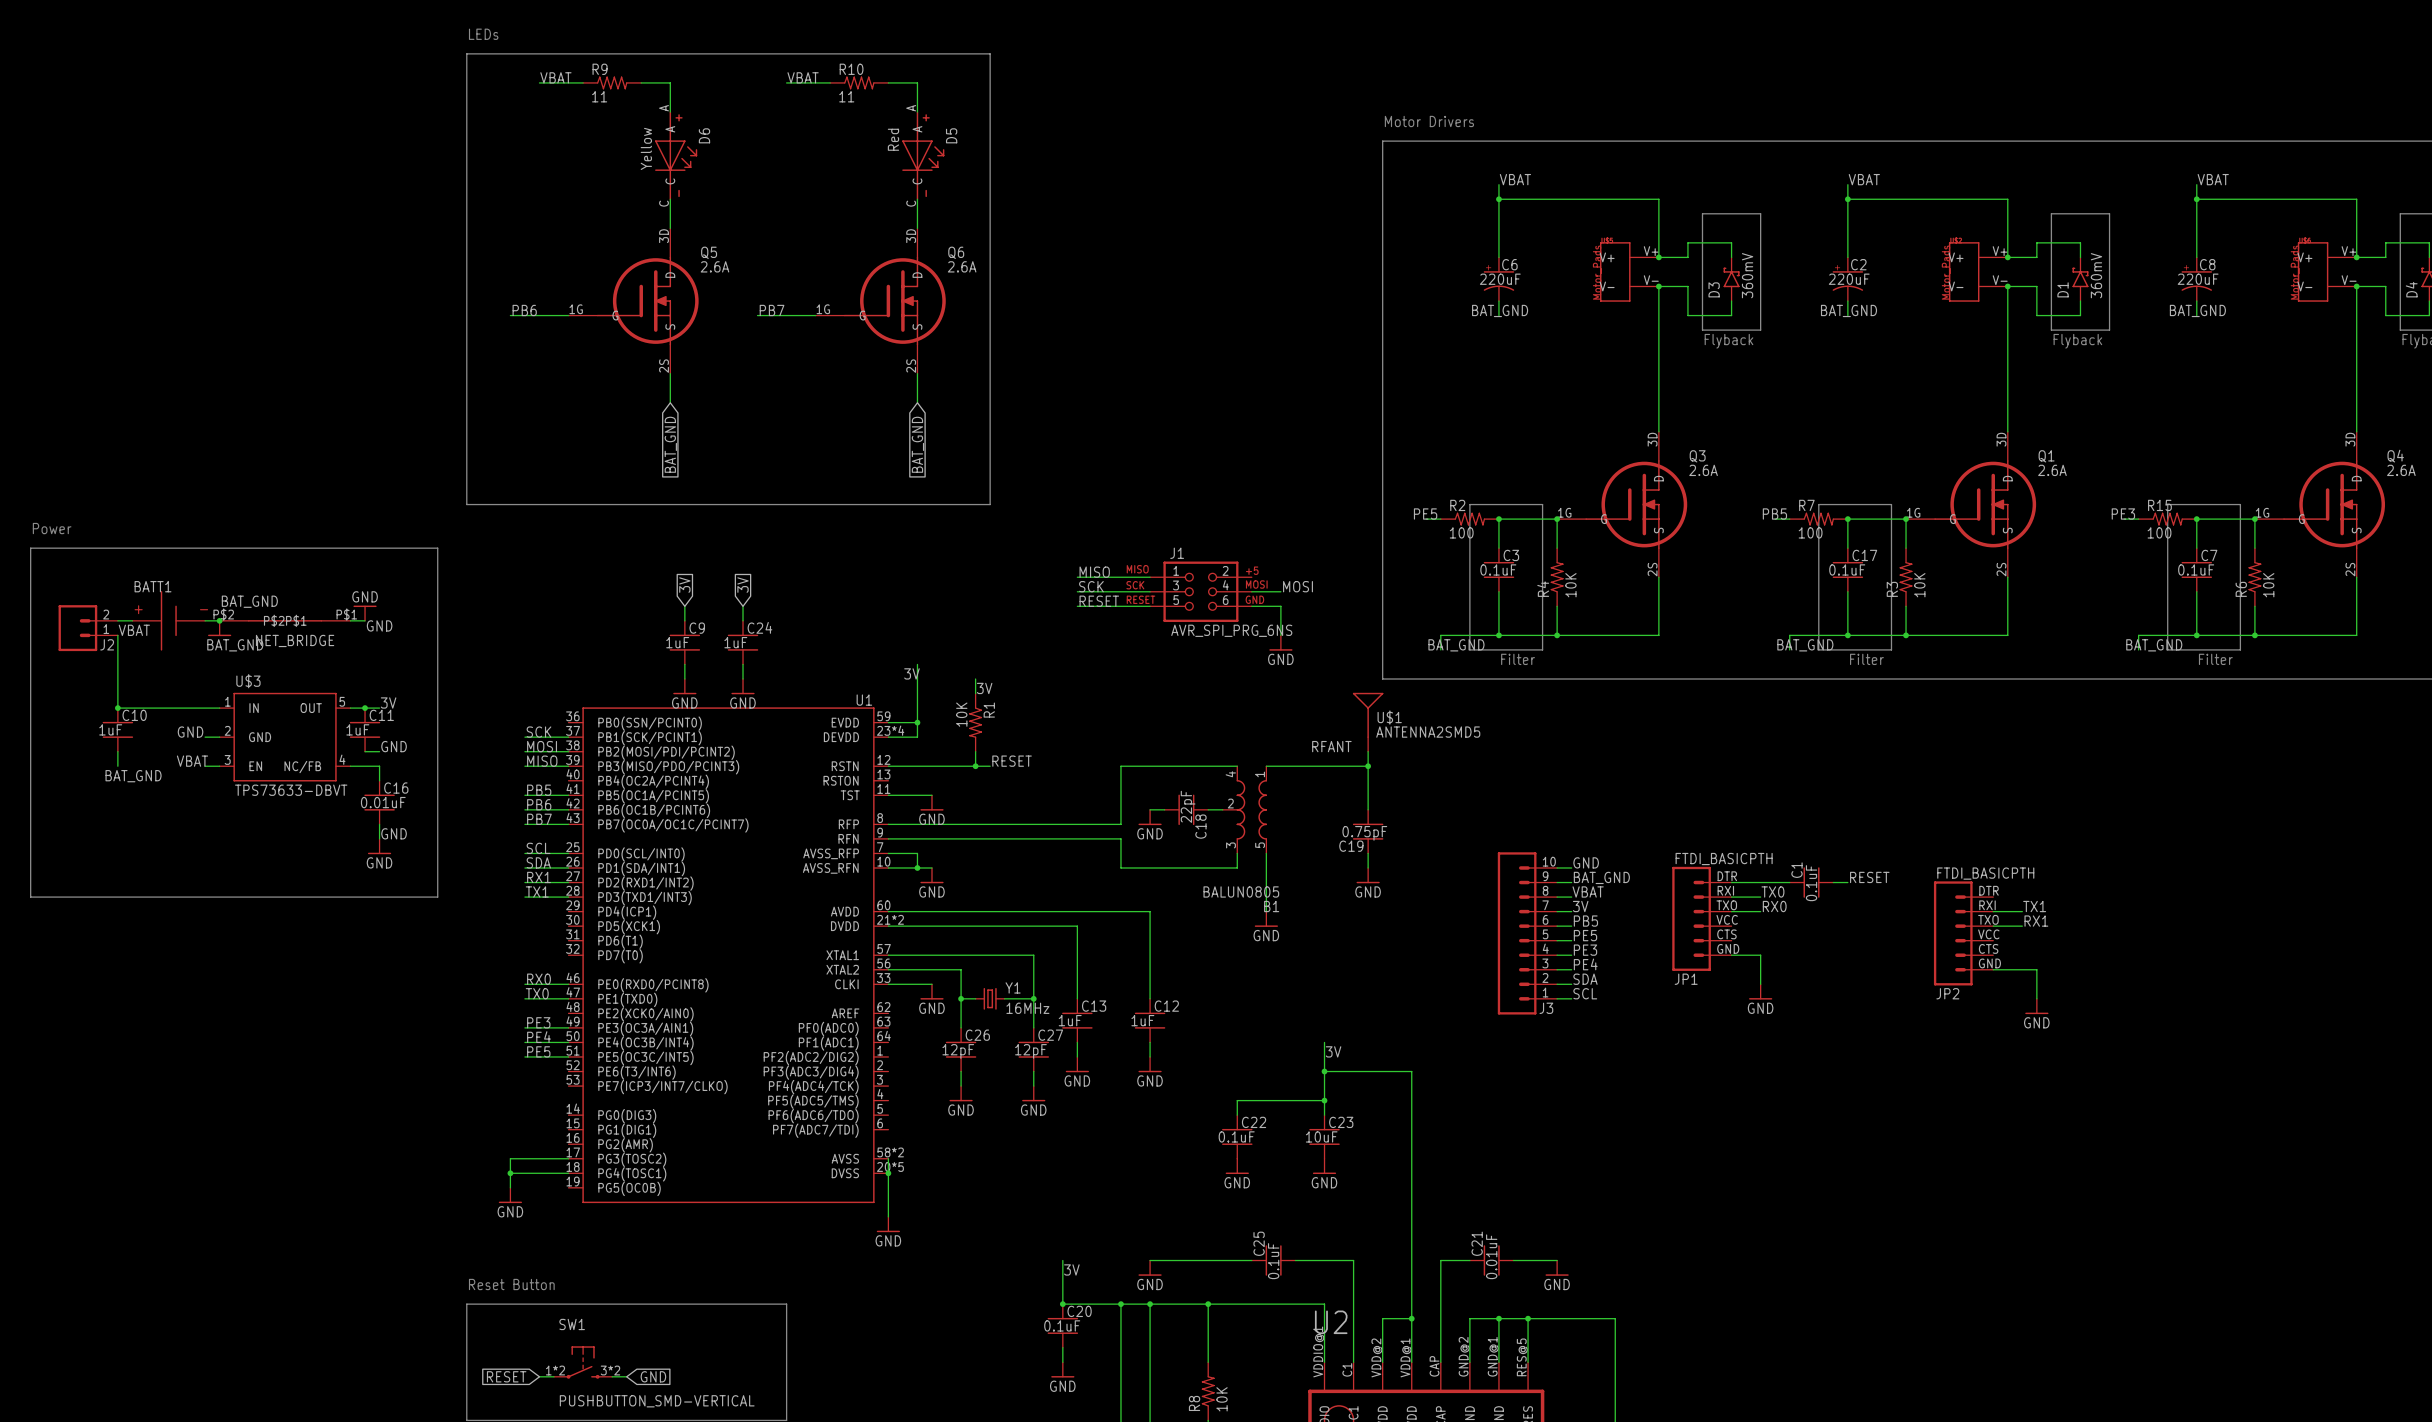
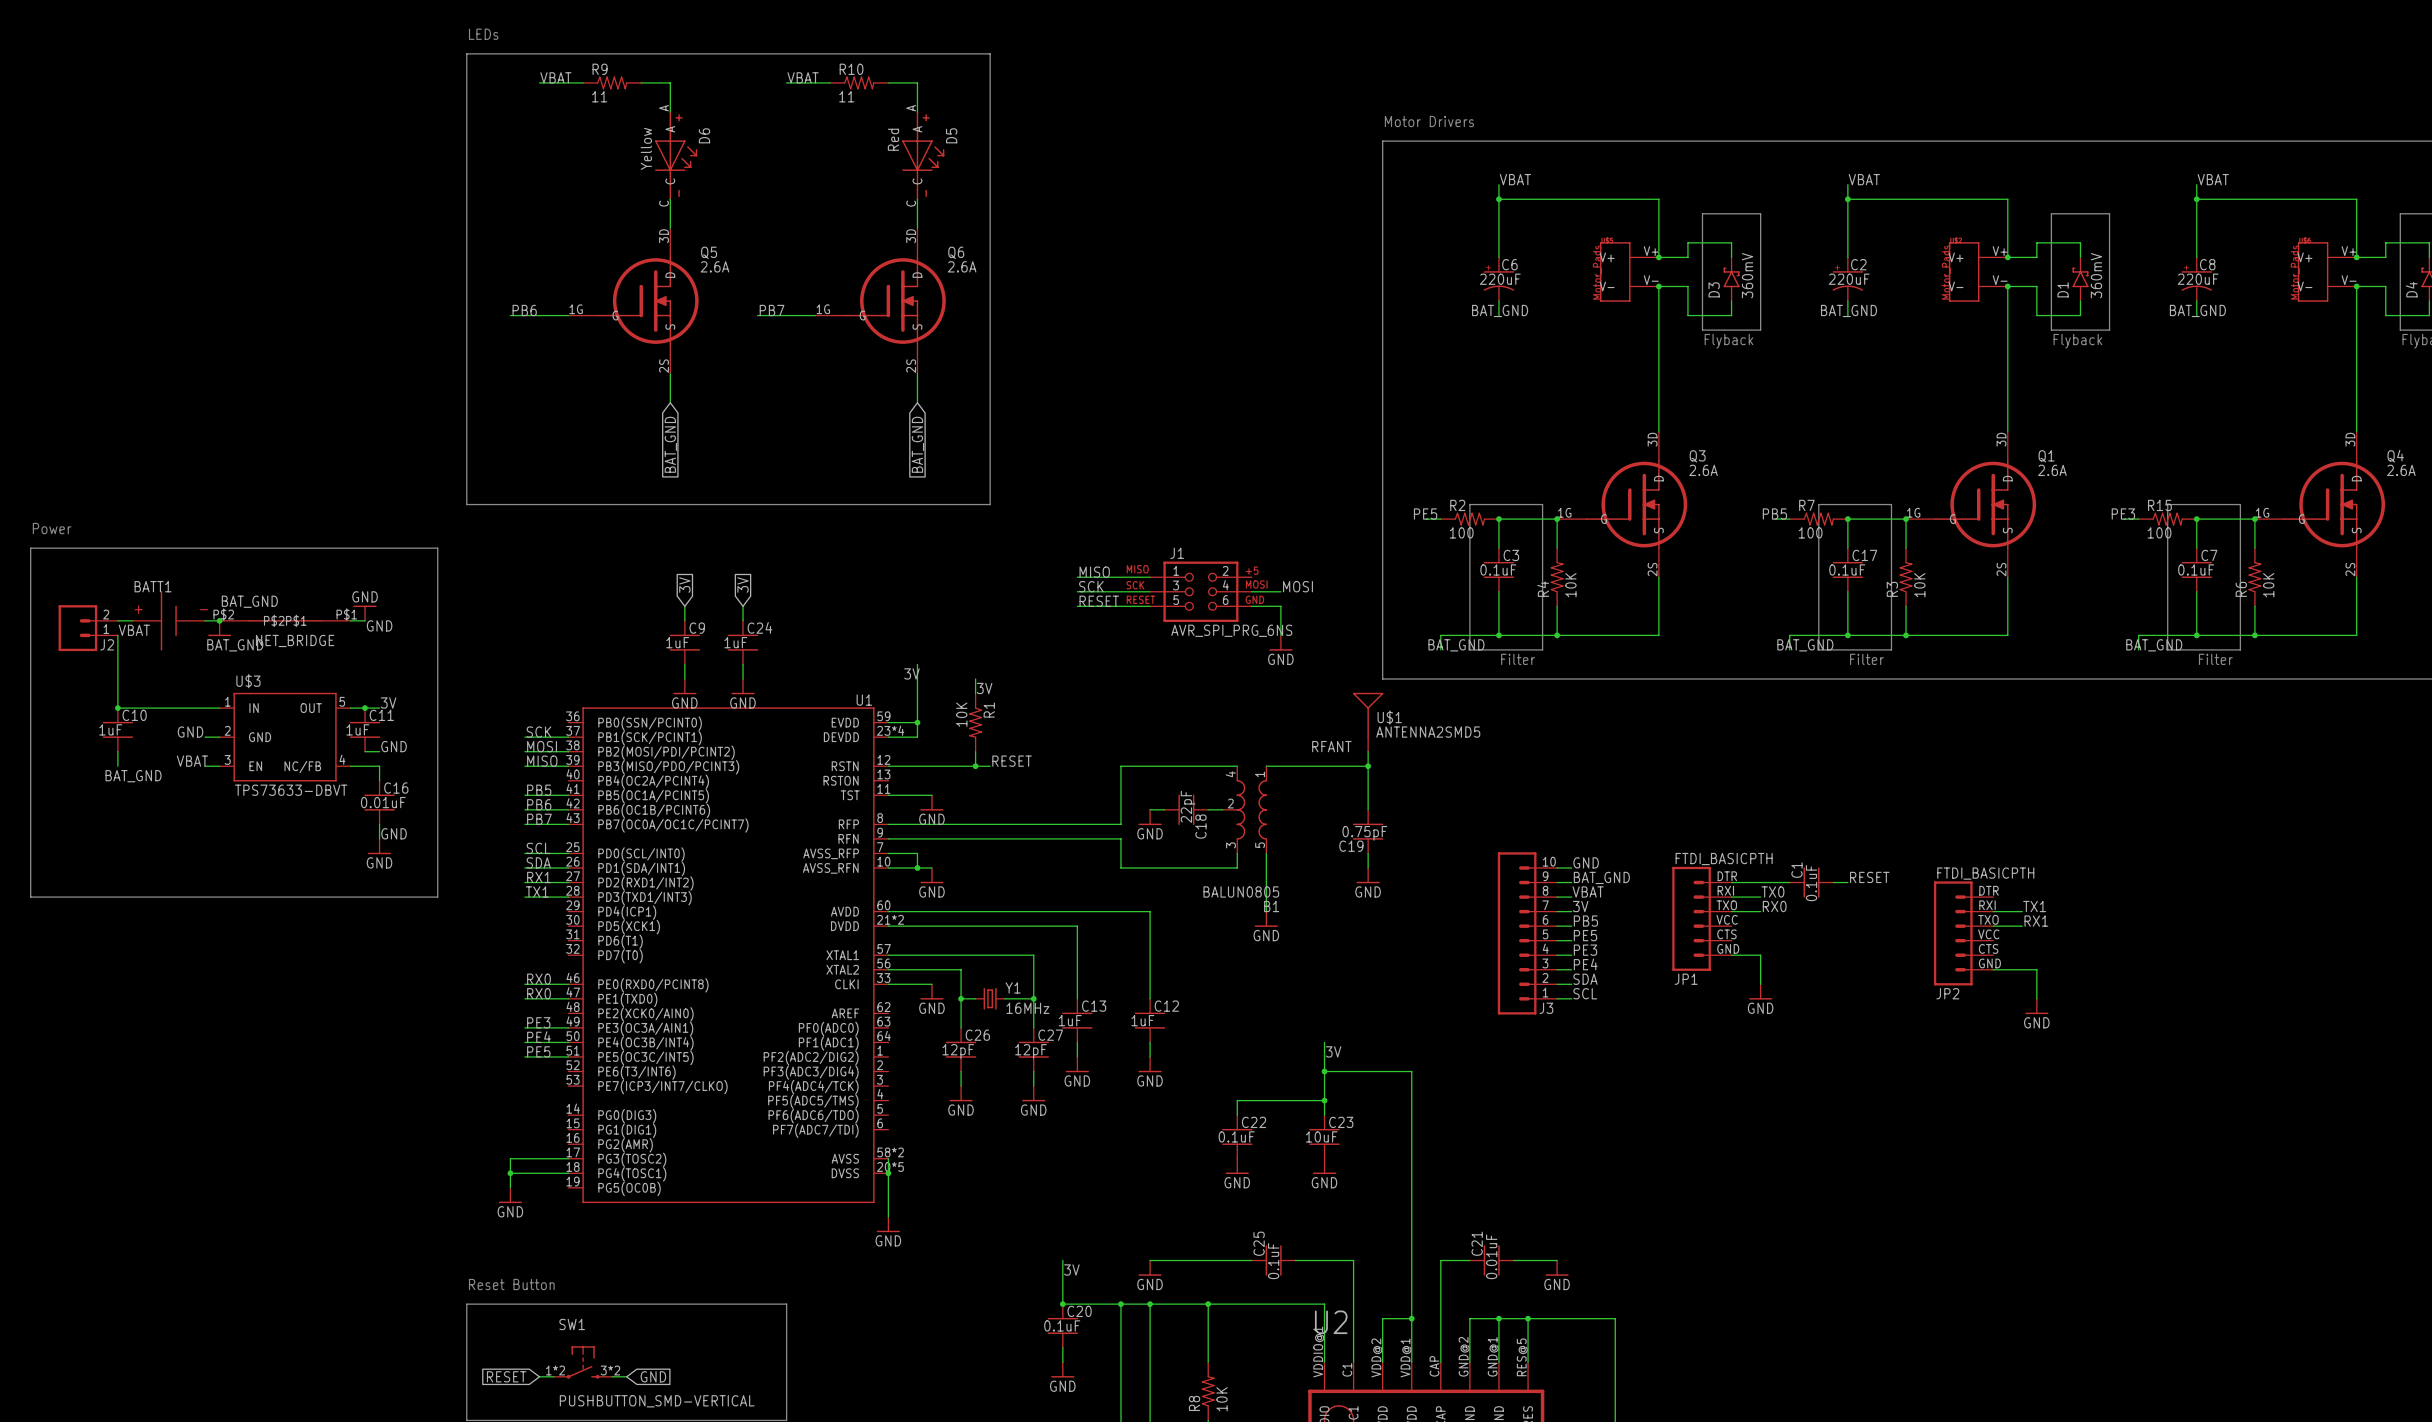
label: TX0 (537, 993) -> RX0 (538, 993)

